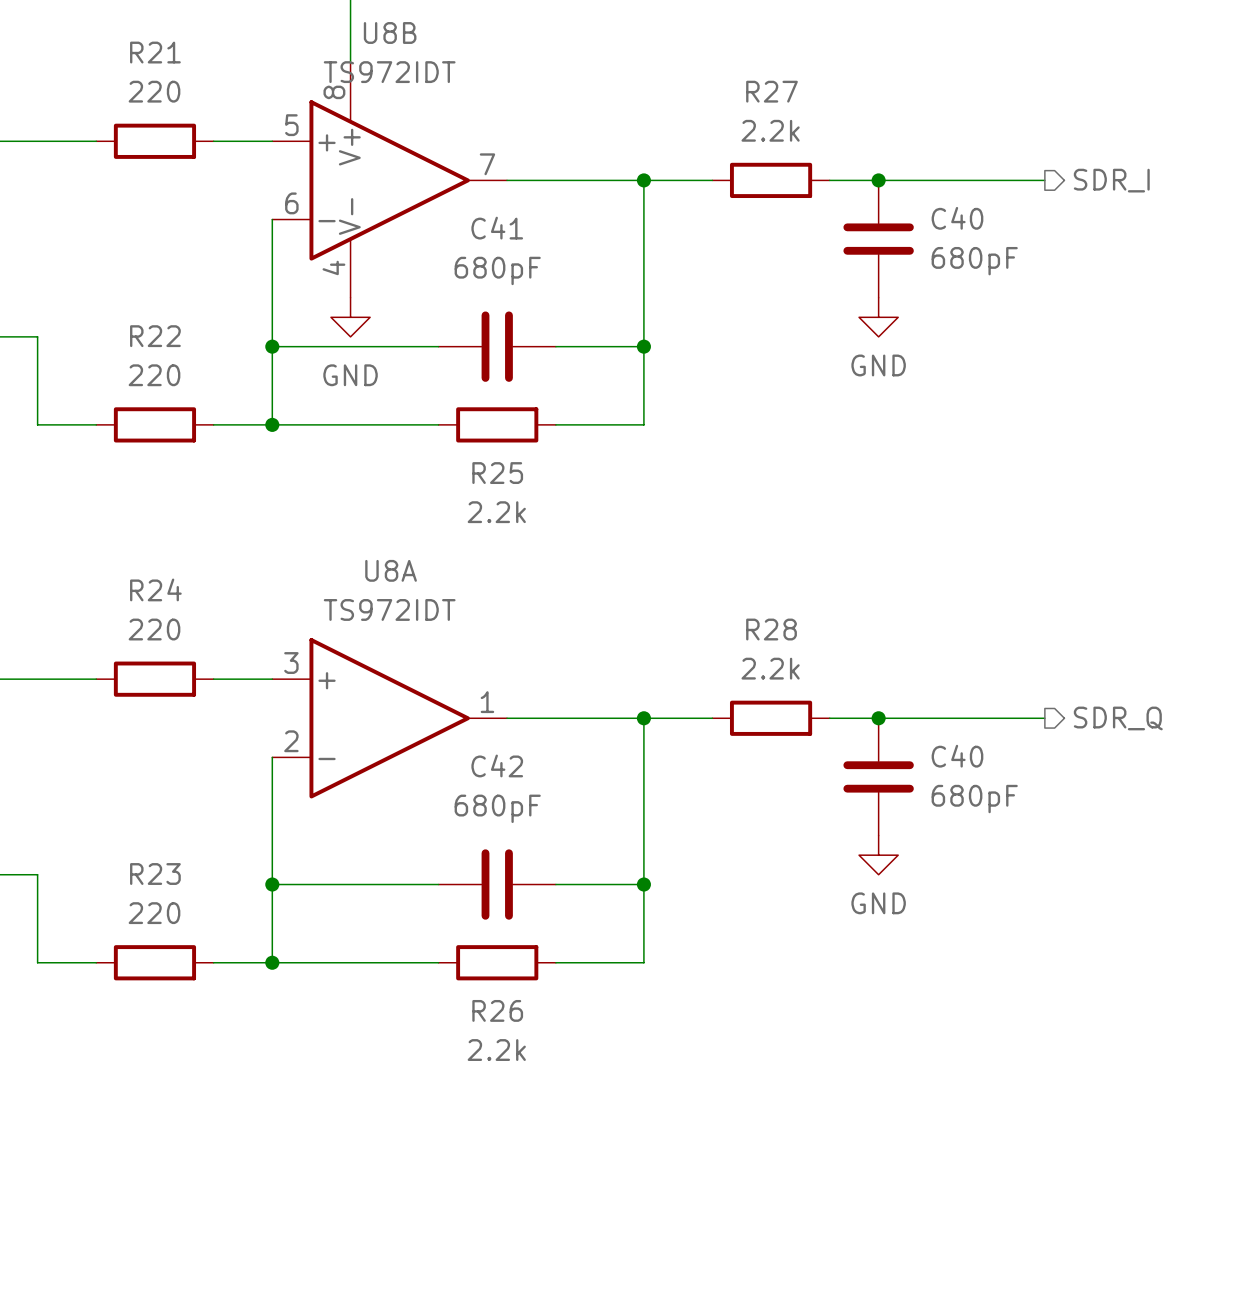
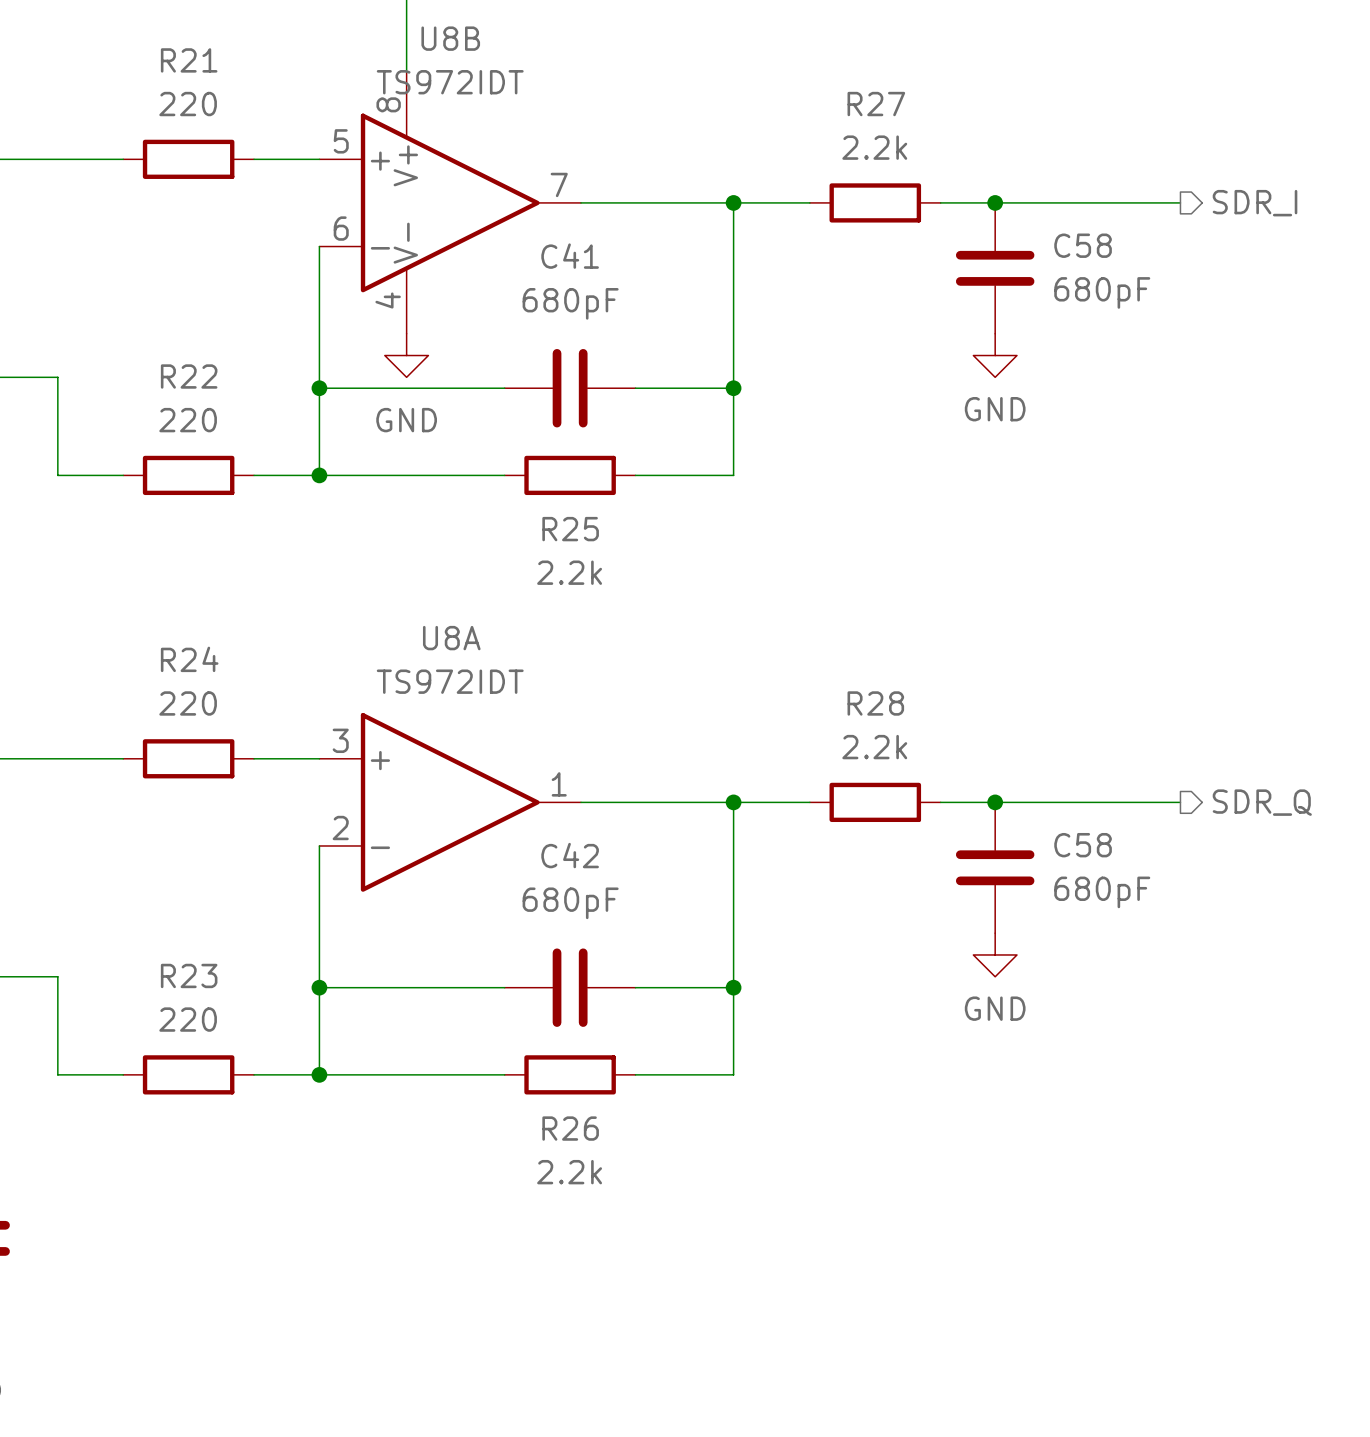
C40 name: C40 (957, 218) -> C58 (1083, 245)
C40 name: C40 (957, 756) -> C58 (1083, 845)

